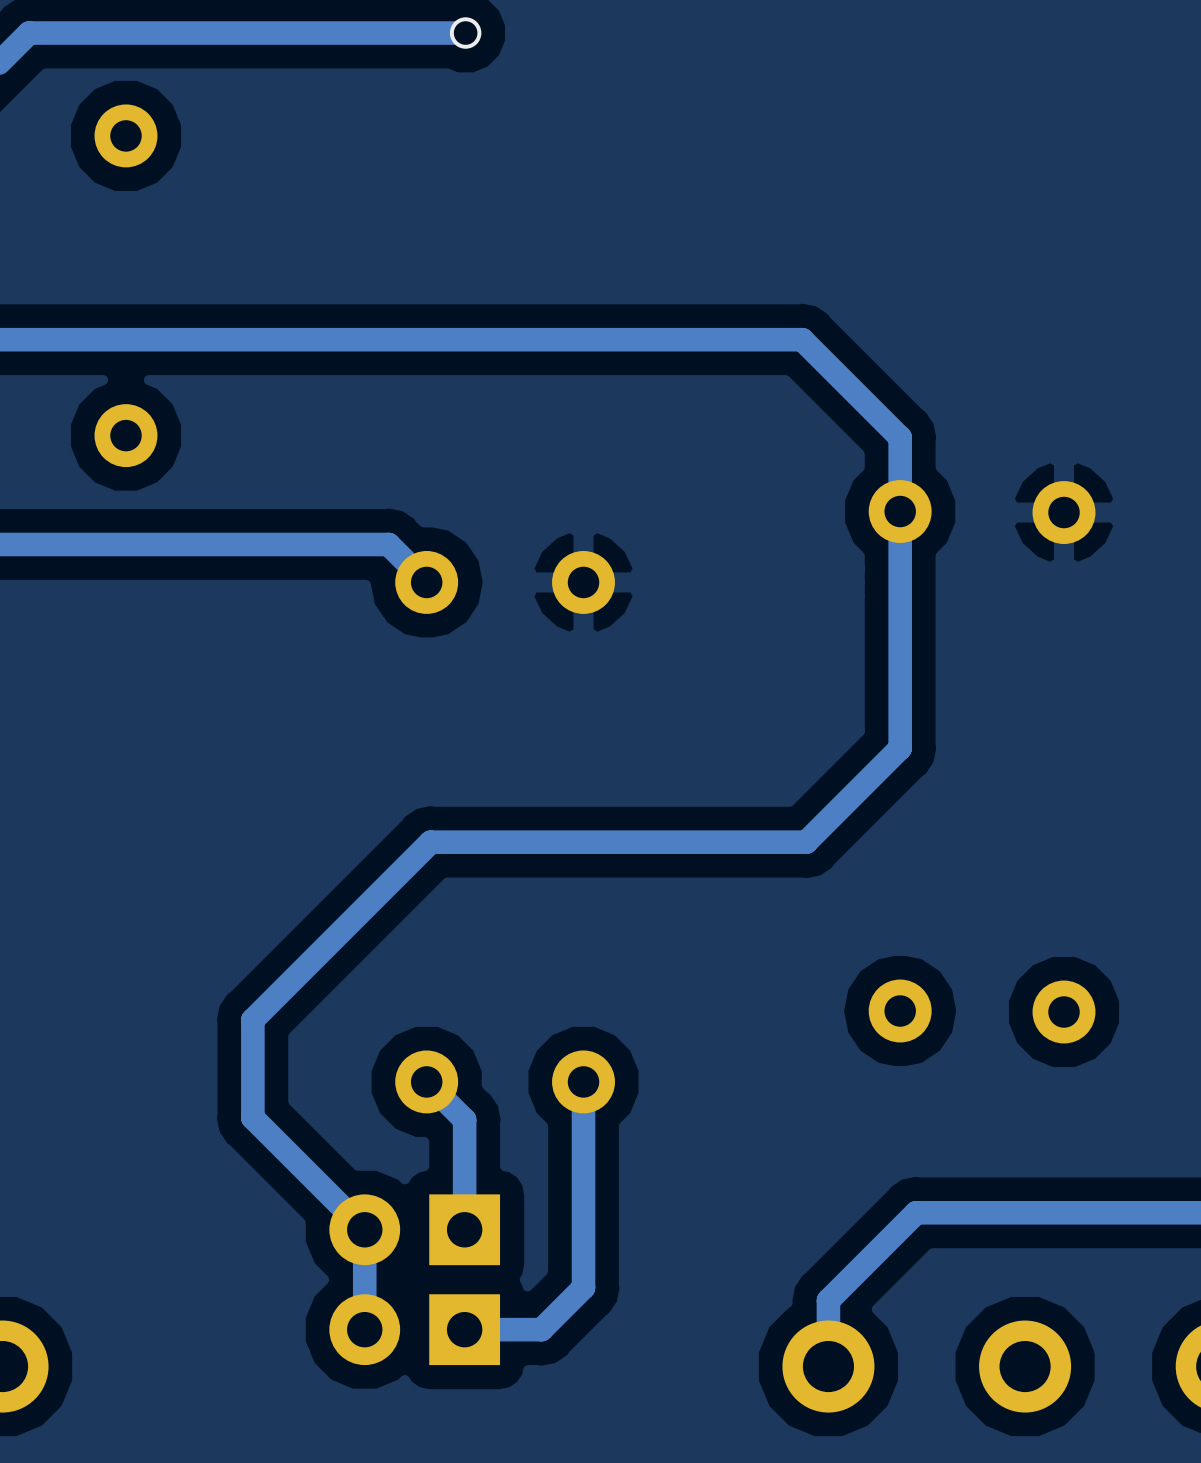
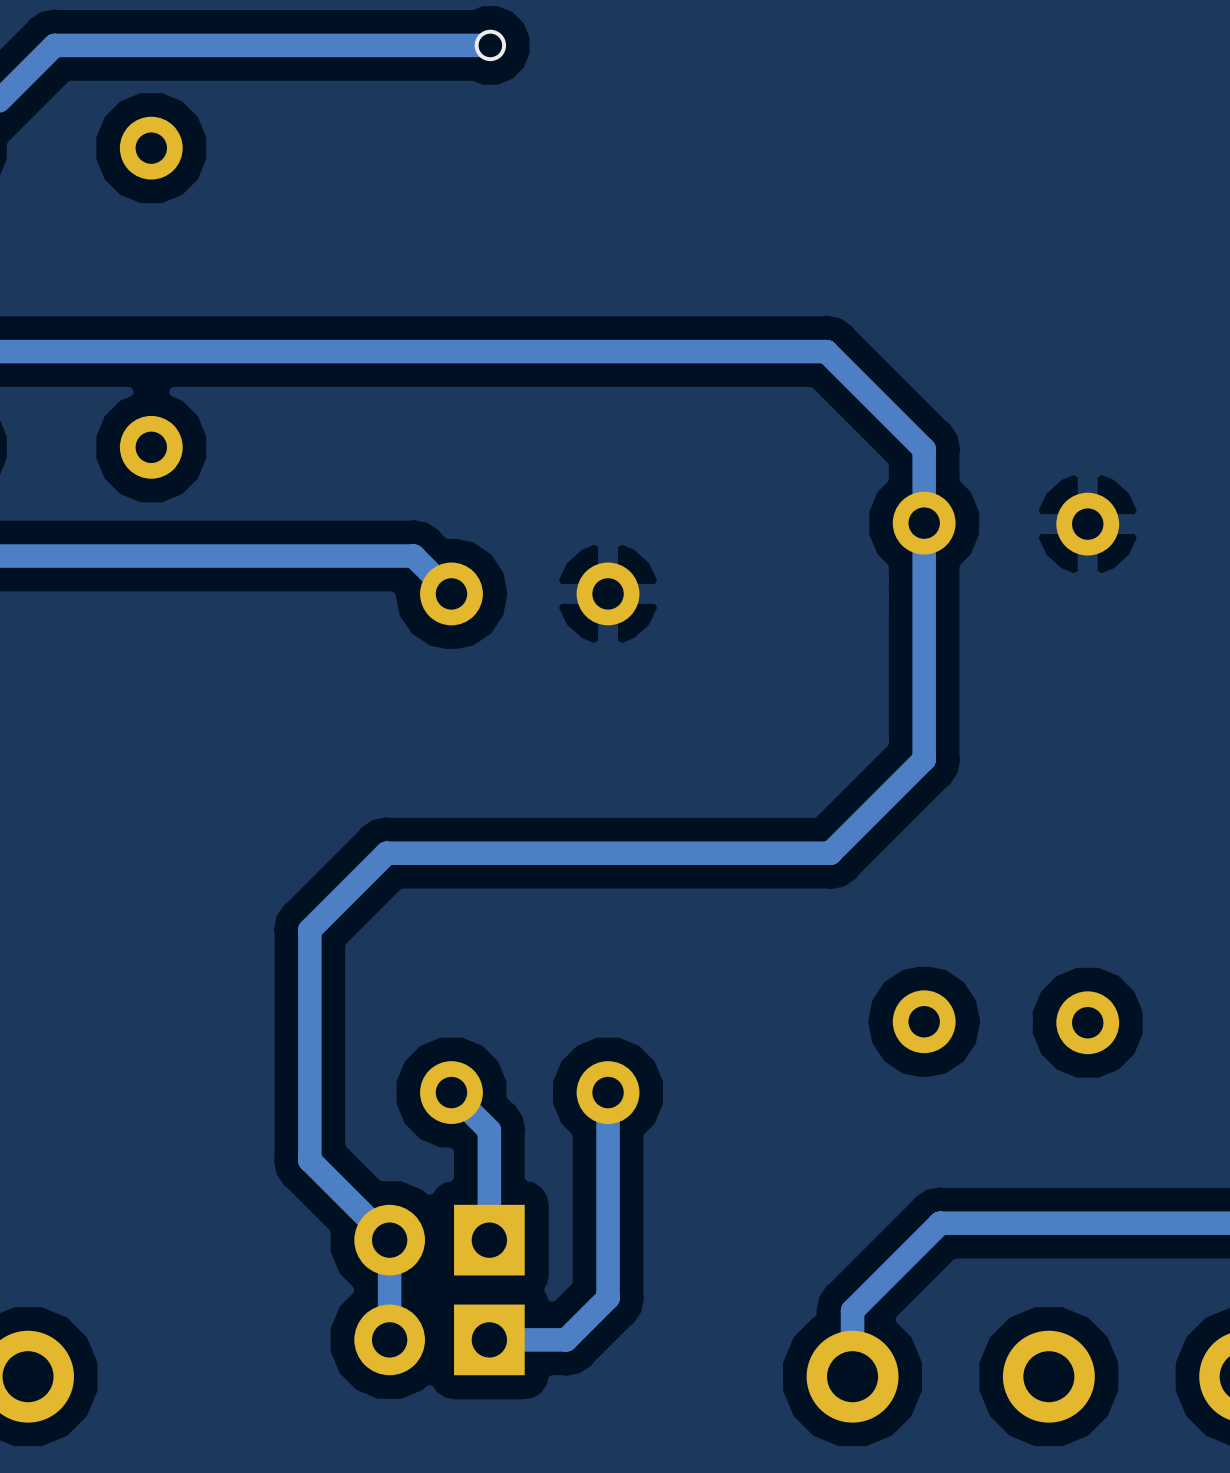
track: (430, 842) (252, 1019) (252, 1117) (284, 1149) -> (455, 853) (386, 853) (309, 930) (309, 1160)

